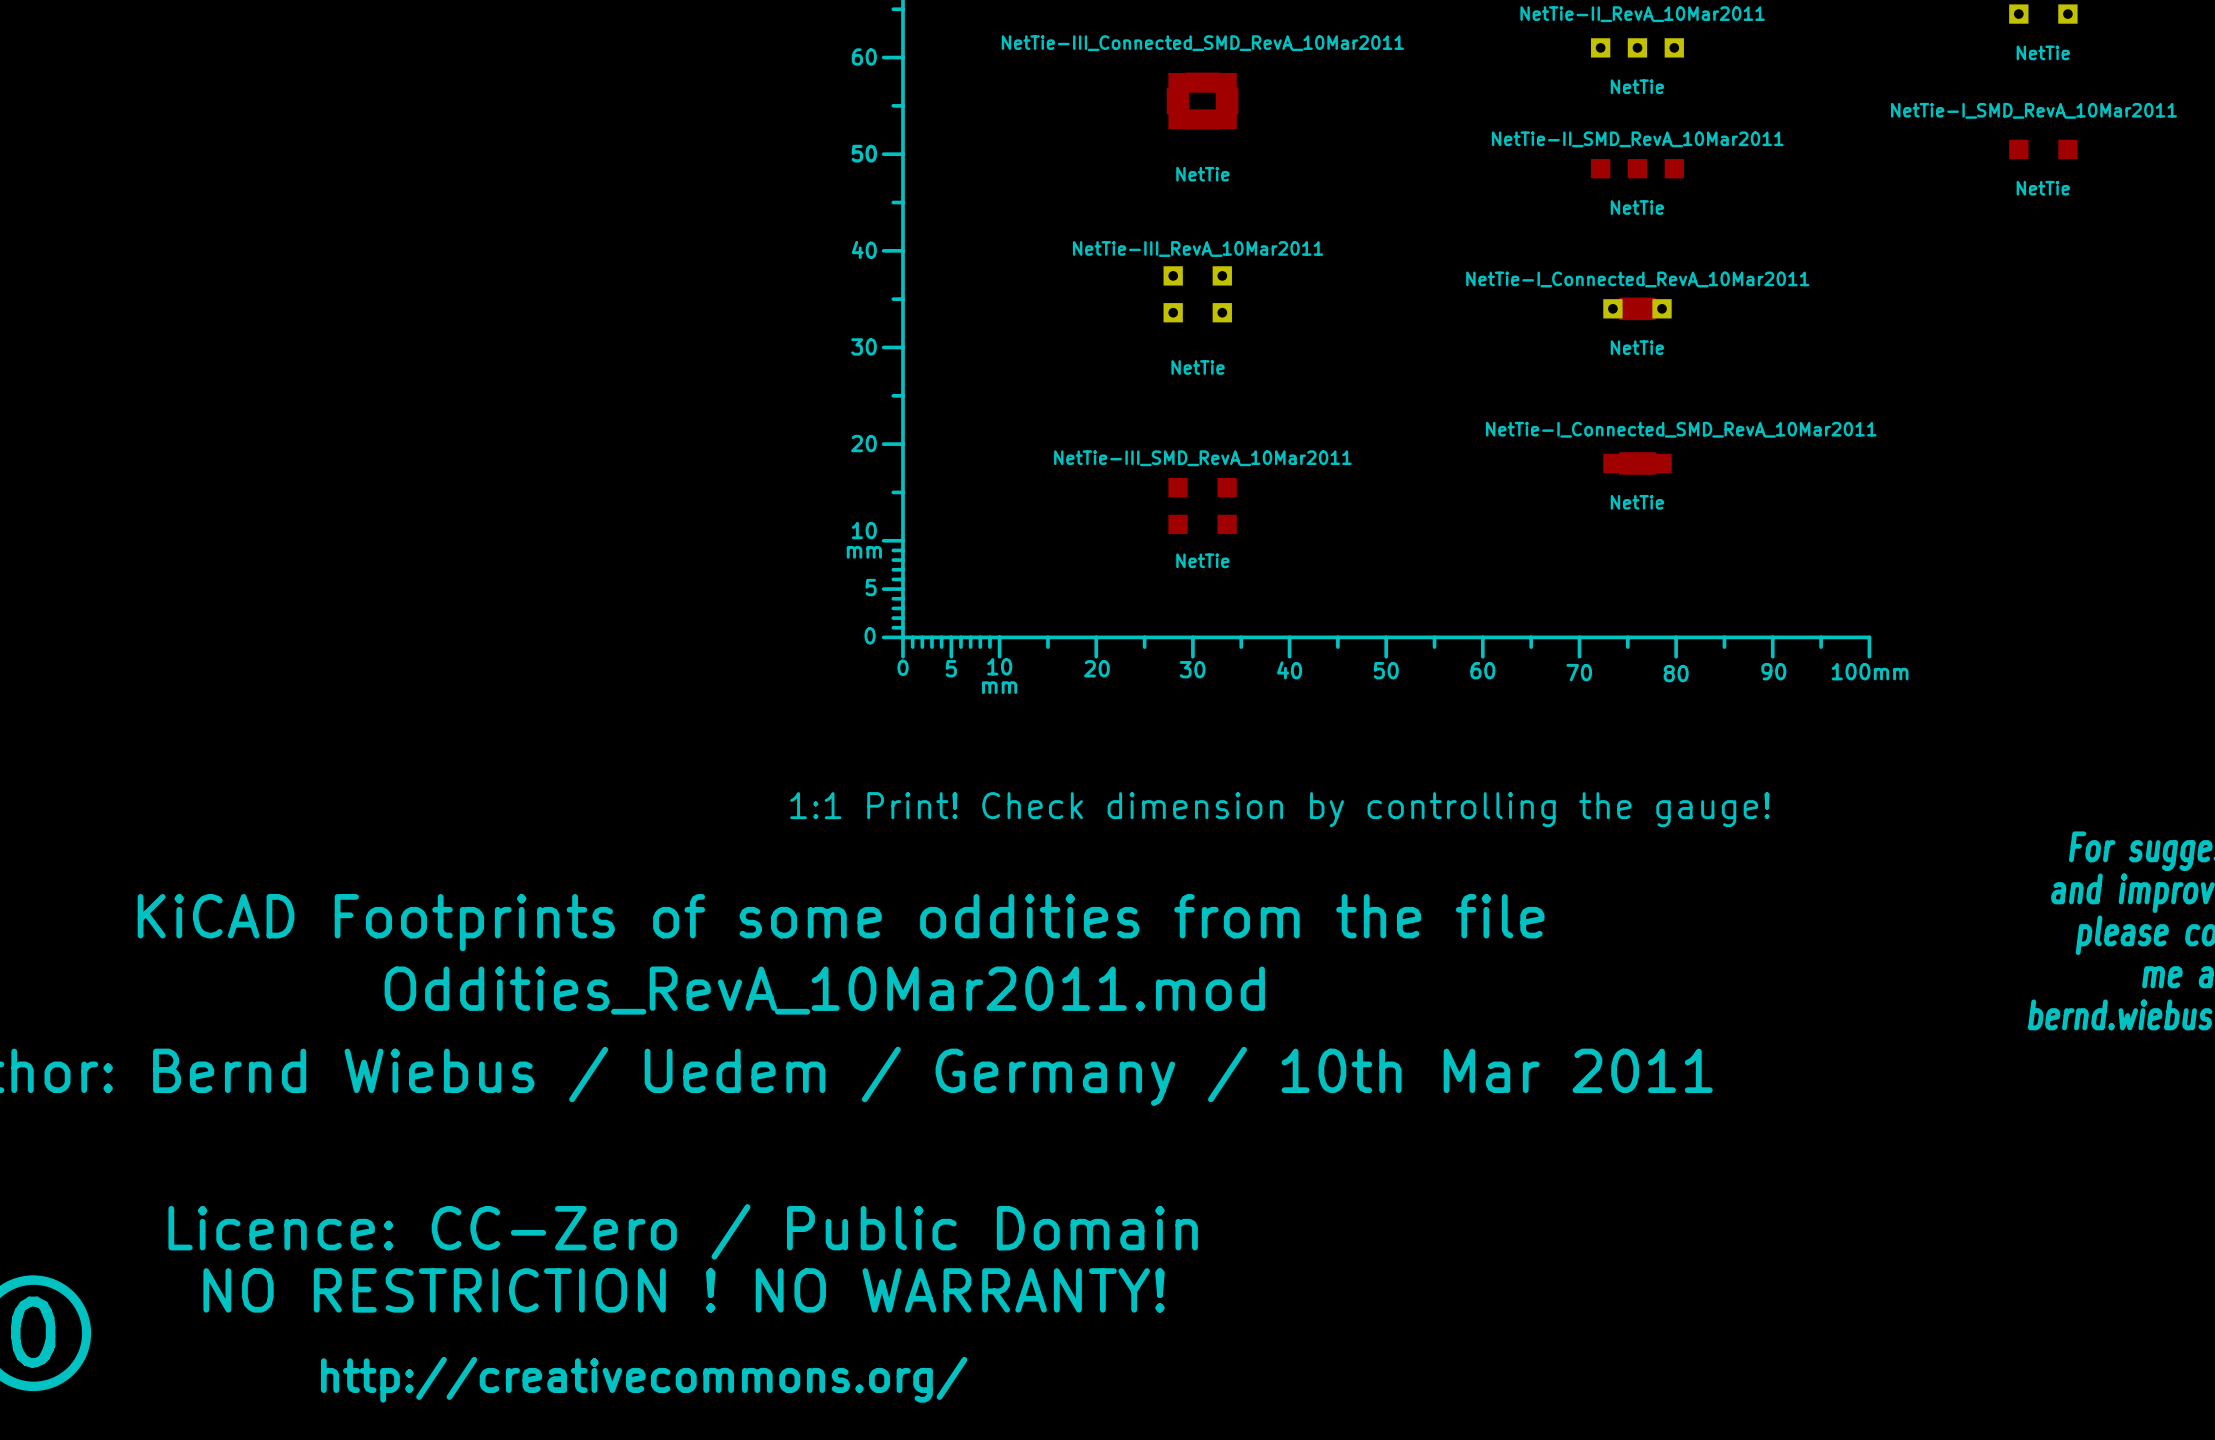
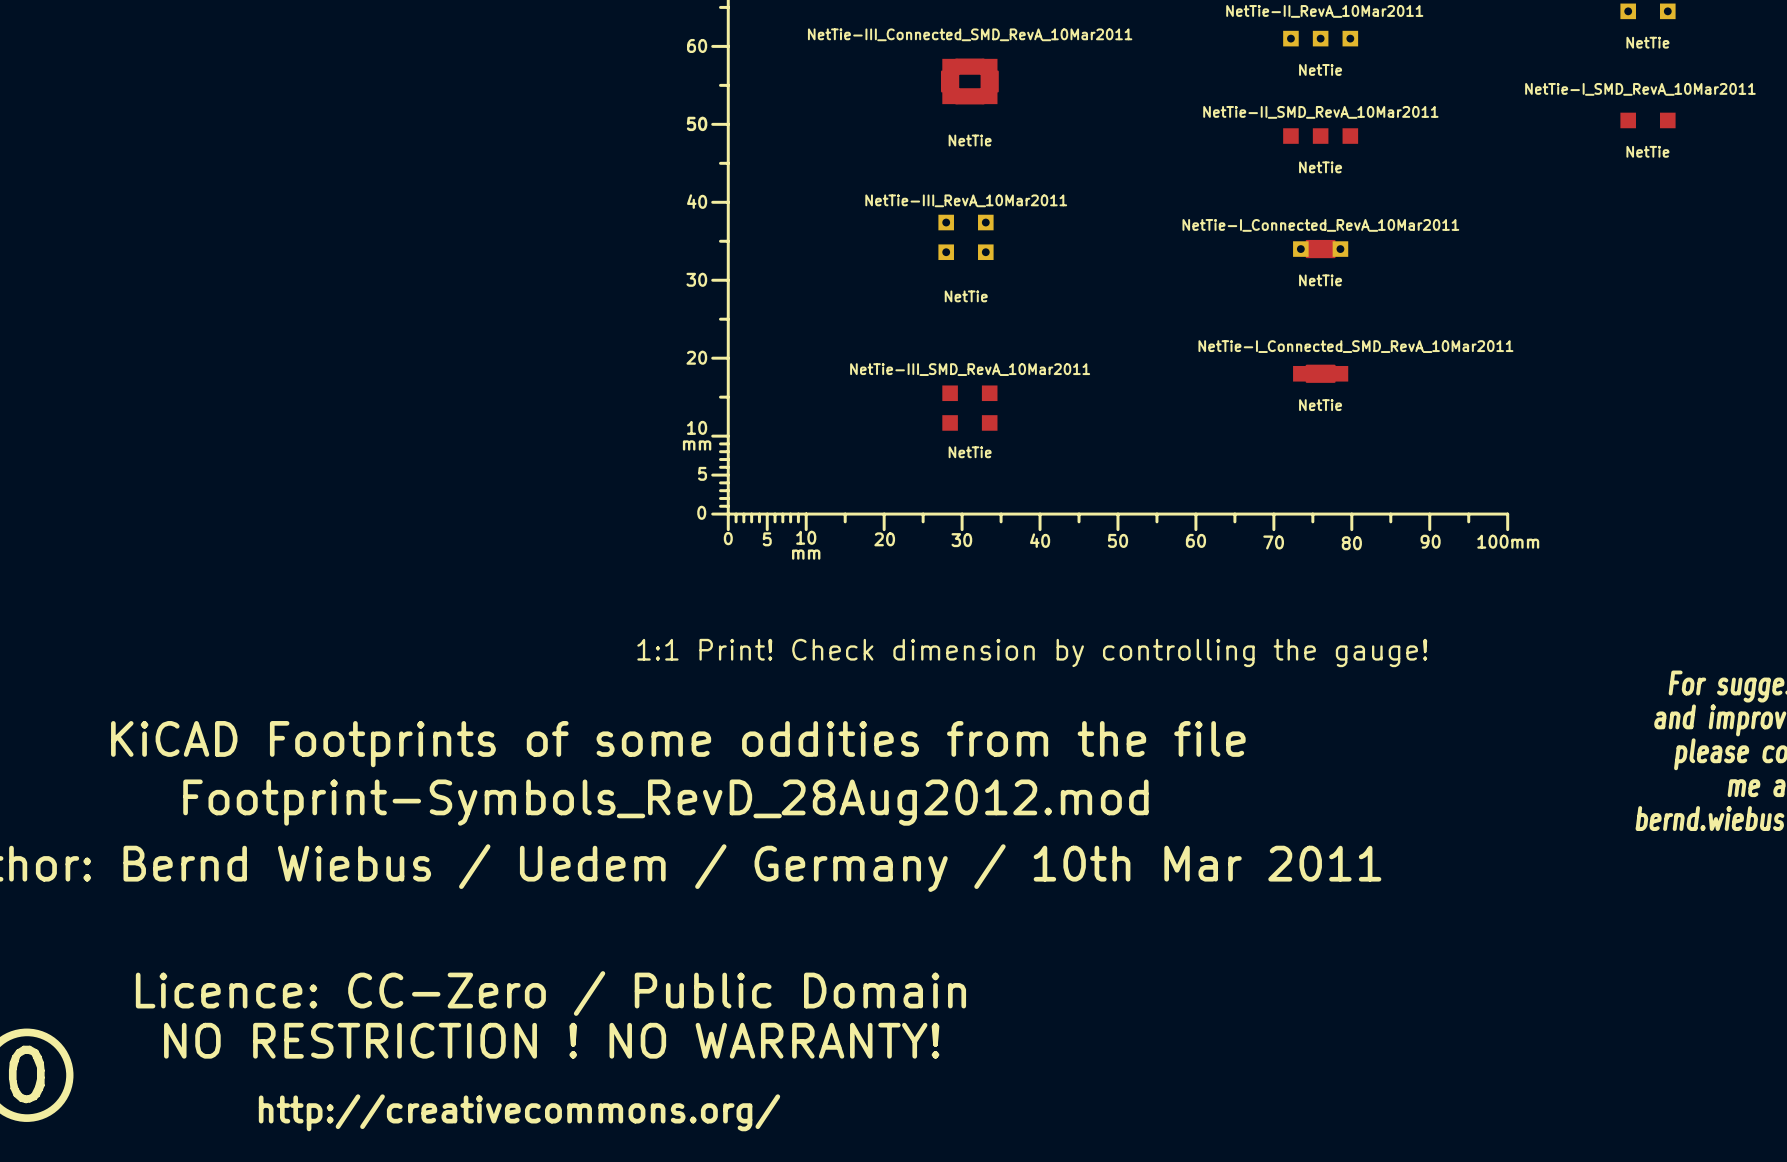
text: Oddities_RevA_10Mar2011.mod (824, 990) -> Footprint-Symbols_RevD_28Aug2012.mod (665, 802)

